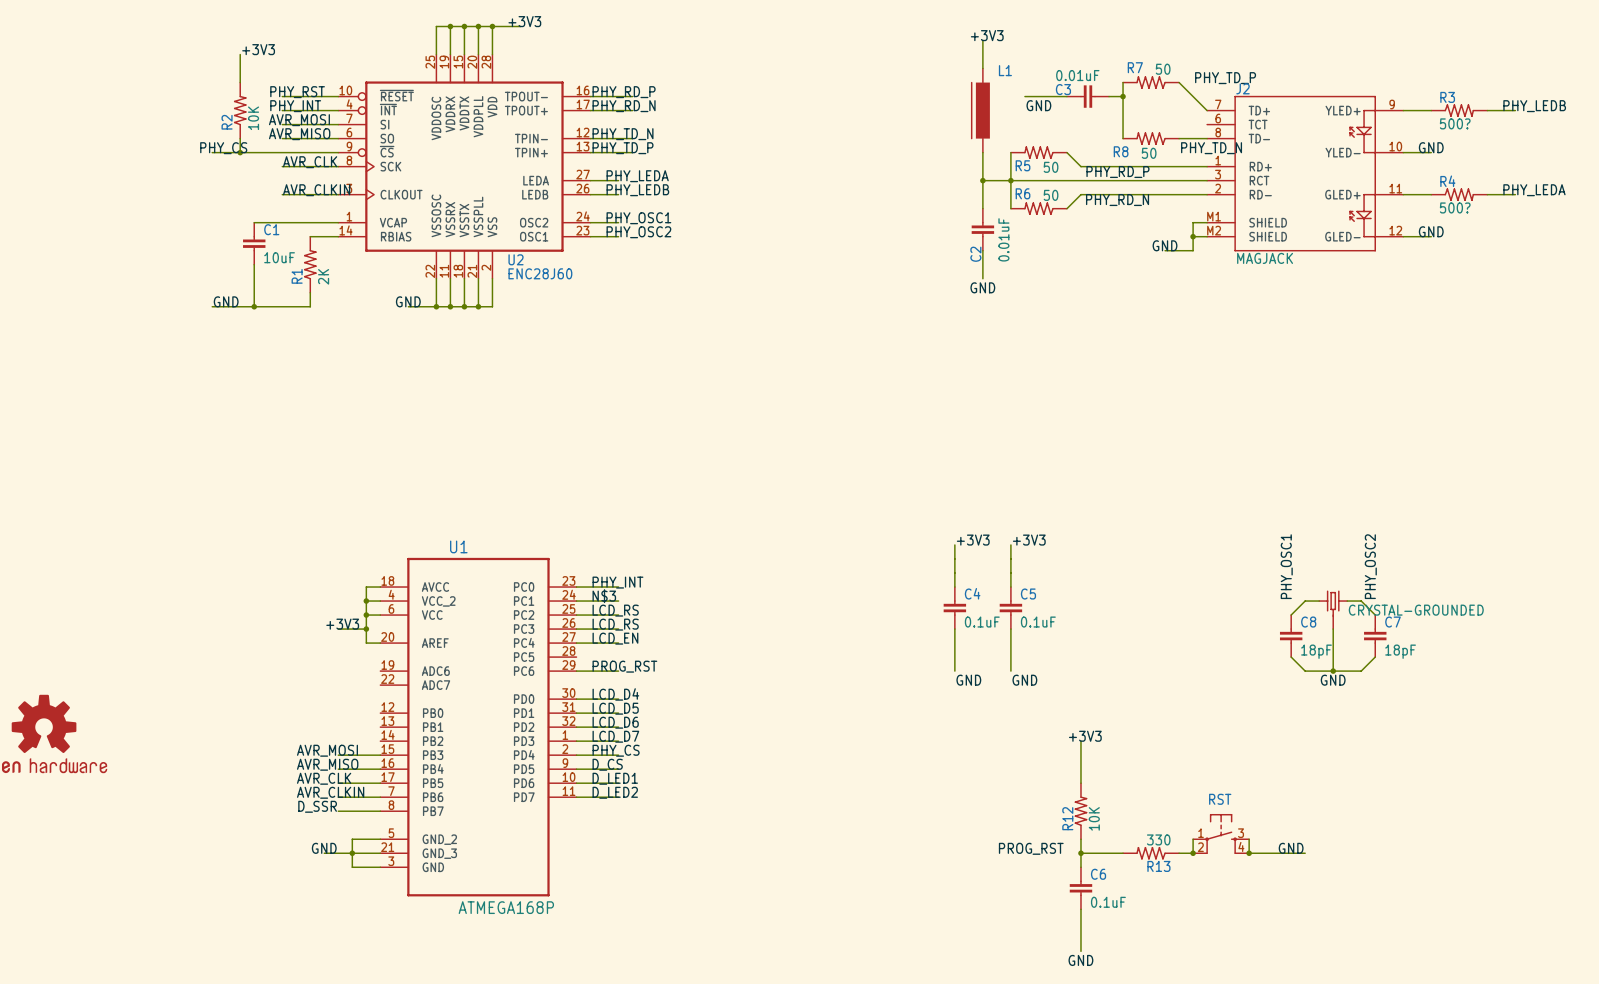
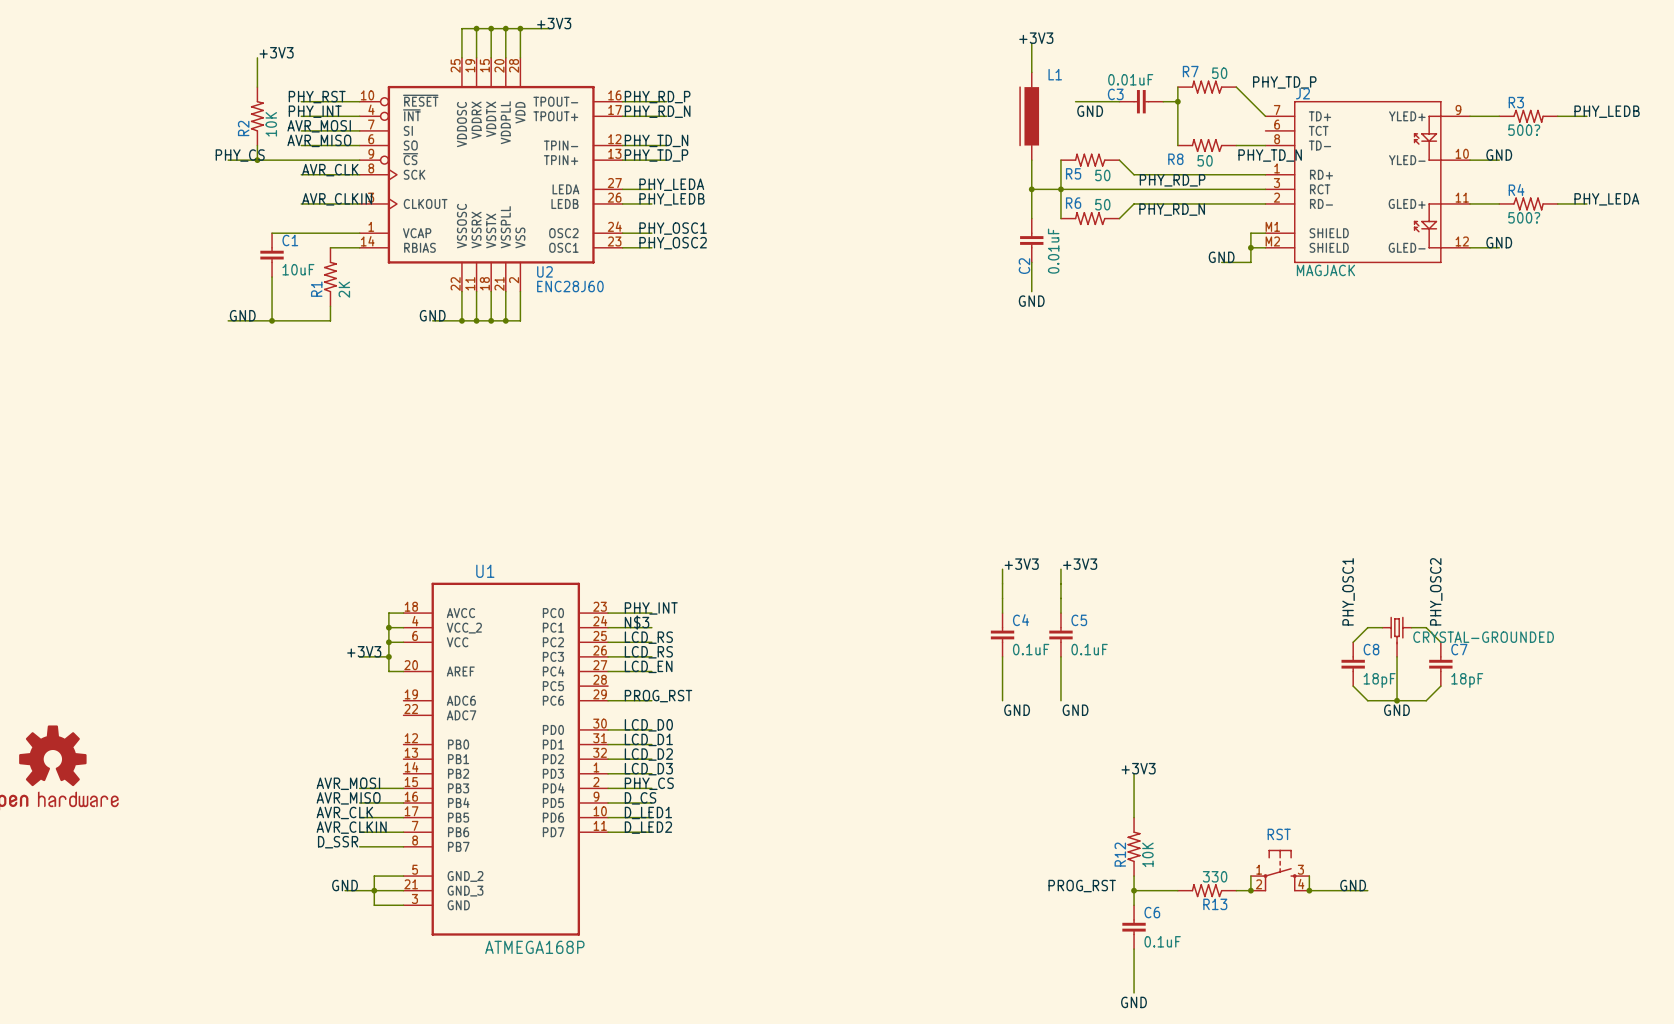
label: LCD_D4 (615, 694) -> LCD_D0 (648, 725)
label: LCD_D5 (615, 708) -> LCD_D1 (648, 739)
label: LCD_D6 (615, 722) -> LCD_D2 (648, 754)
label: LCD_D7 (615, 736) -> LCD_D3 (648, 769)

